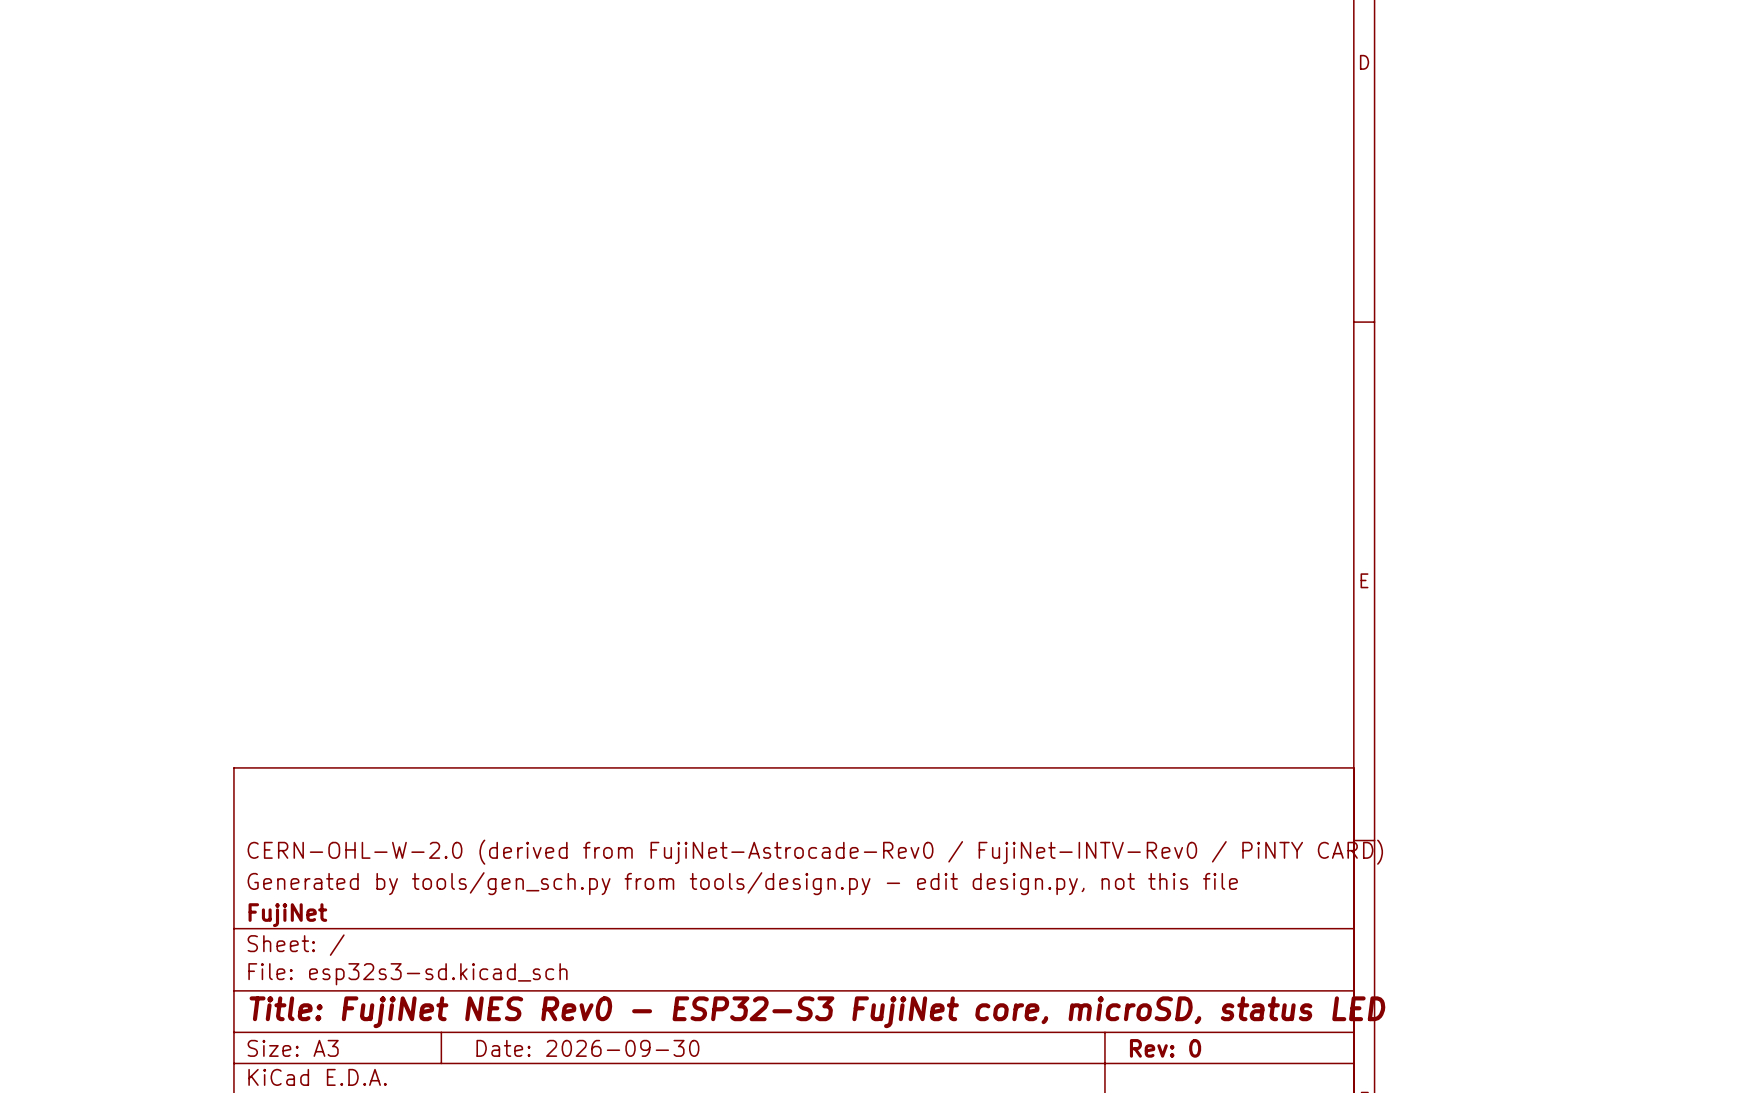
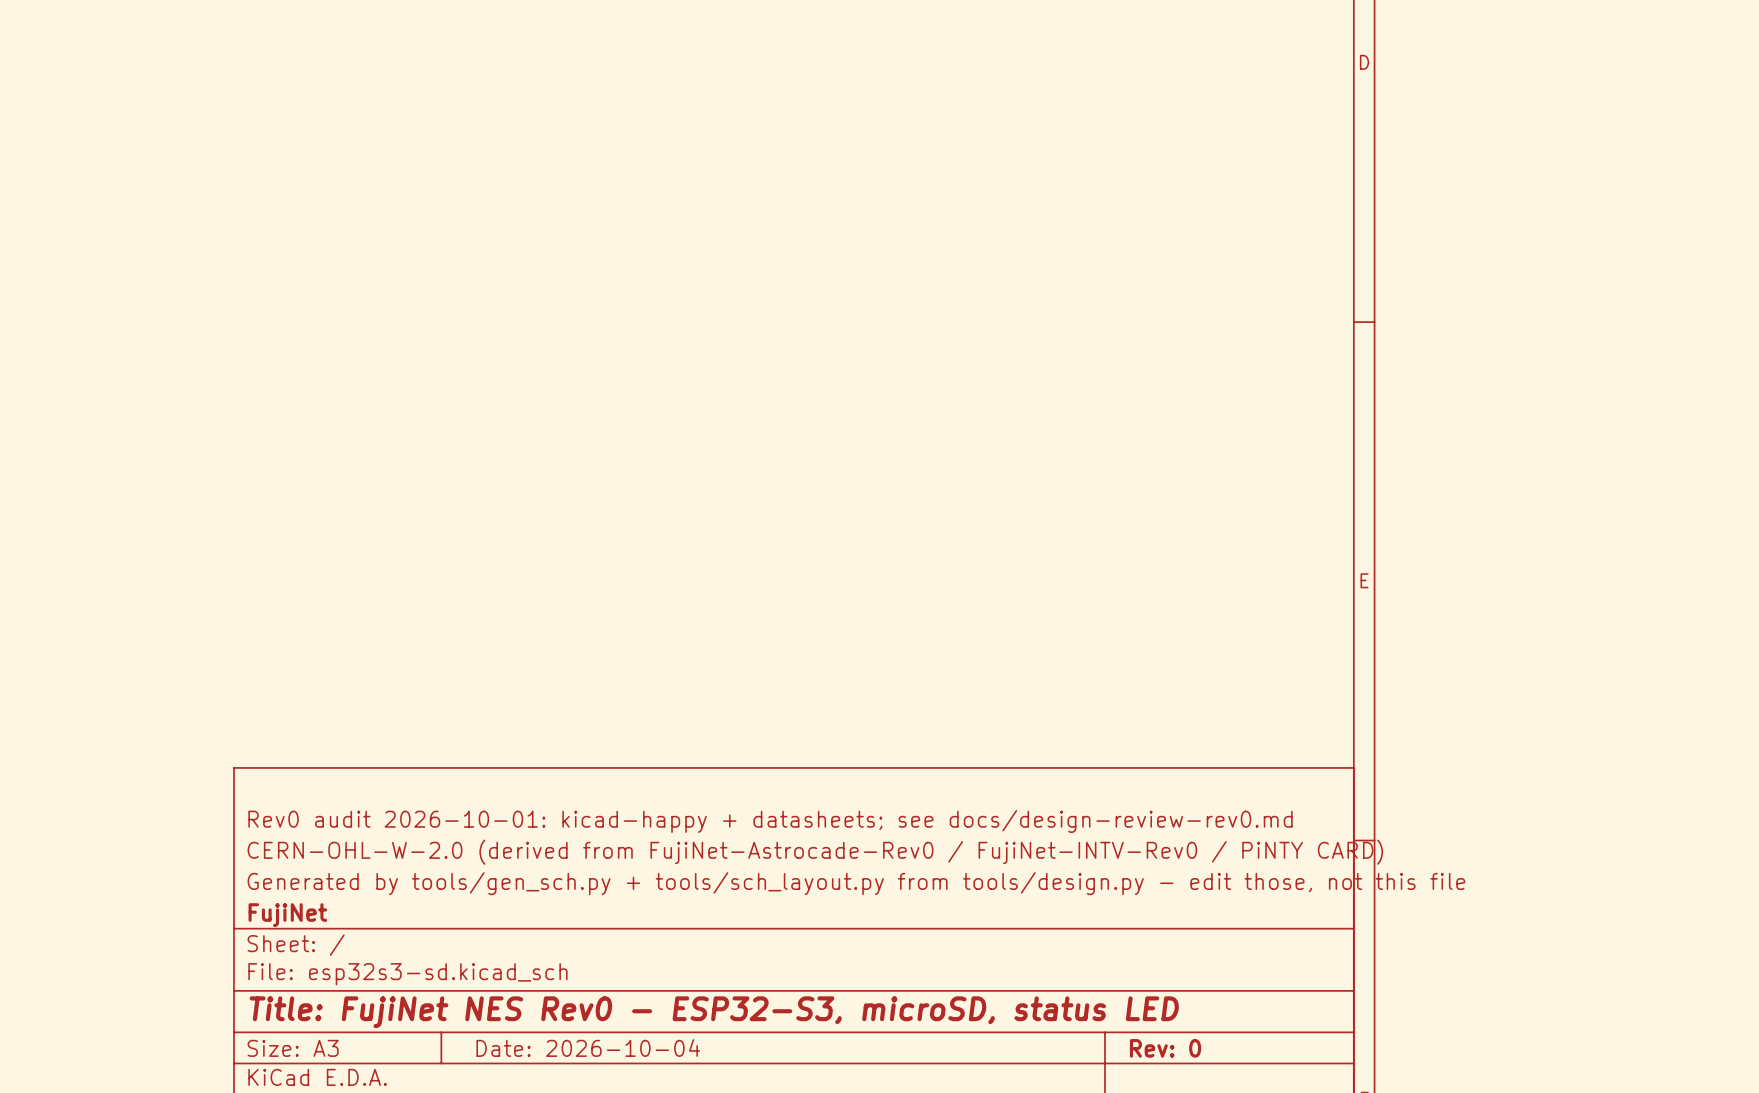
title block: none -> Rev0 audit 2026-10-01: kicad-happy + datasheets; see docs/design-review-rev0.md (770, 821)
title block: Generated by tools/gen_sch.py from tools/design.py - edit design.py, not this file (742, 883) -> Generated by tools/gen_sch.py + tools/sch_layout.py from tools/design.py - edit those, not this file (856, 883)
title block: Title: FujiNet NES Rev0 - ESP32-S3 FujiNet core, microSD, status LED (817, 1012) -> Title: FujiNet NES Rev0 - ESP32-S3, microSD, status LED (714, 1012)
title block: Date: 2026-09-30 (587, 1048) -> Date: 2026-10-04 (588, 1048)

